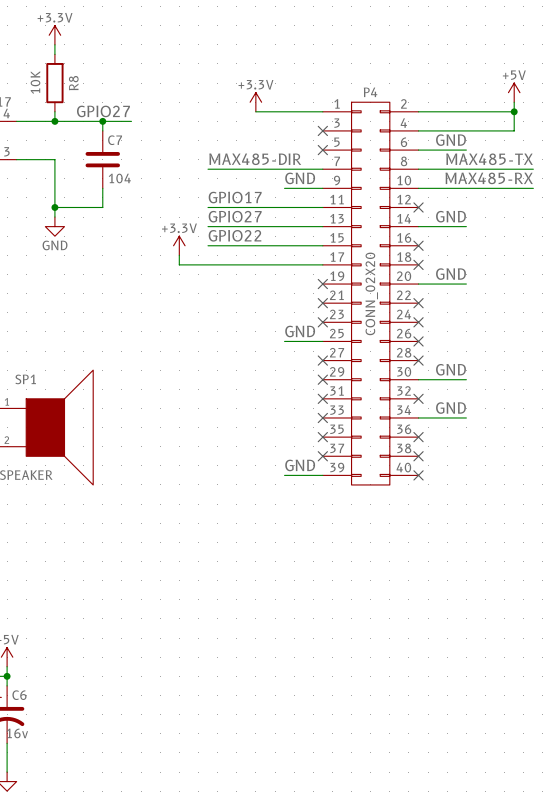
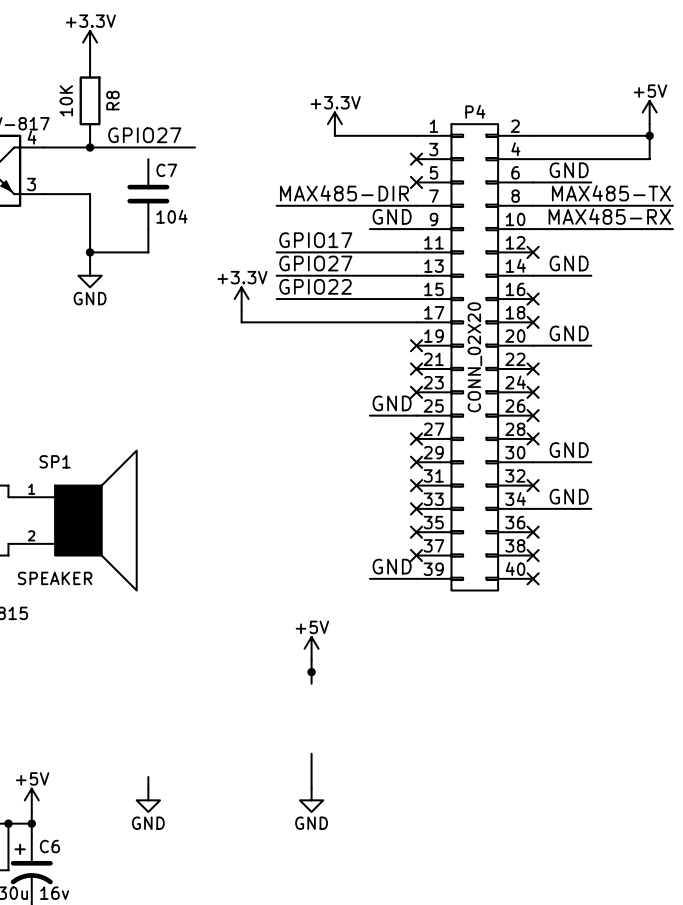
wire: (102, 121) (102, 130) -> none
junction: (102, 121) -> none
wire: none -> (183, 147) (194, 147)
power symbol: none -> +5V (311, 648)
wire: none -> (311, 660) (311, 683)
junction: none -> (311, 672)
wire: none -> (311, 753) (311, 788)
wire: none -> (148, 777) (148, 788)
power symbol: none -> GND (148, 800)
power symbol: none -> GND (311, 800)

